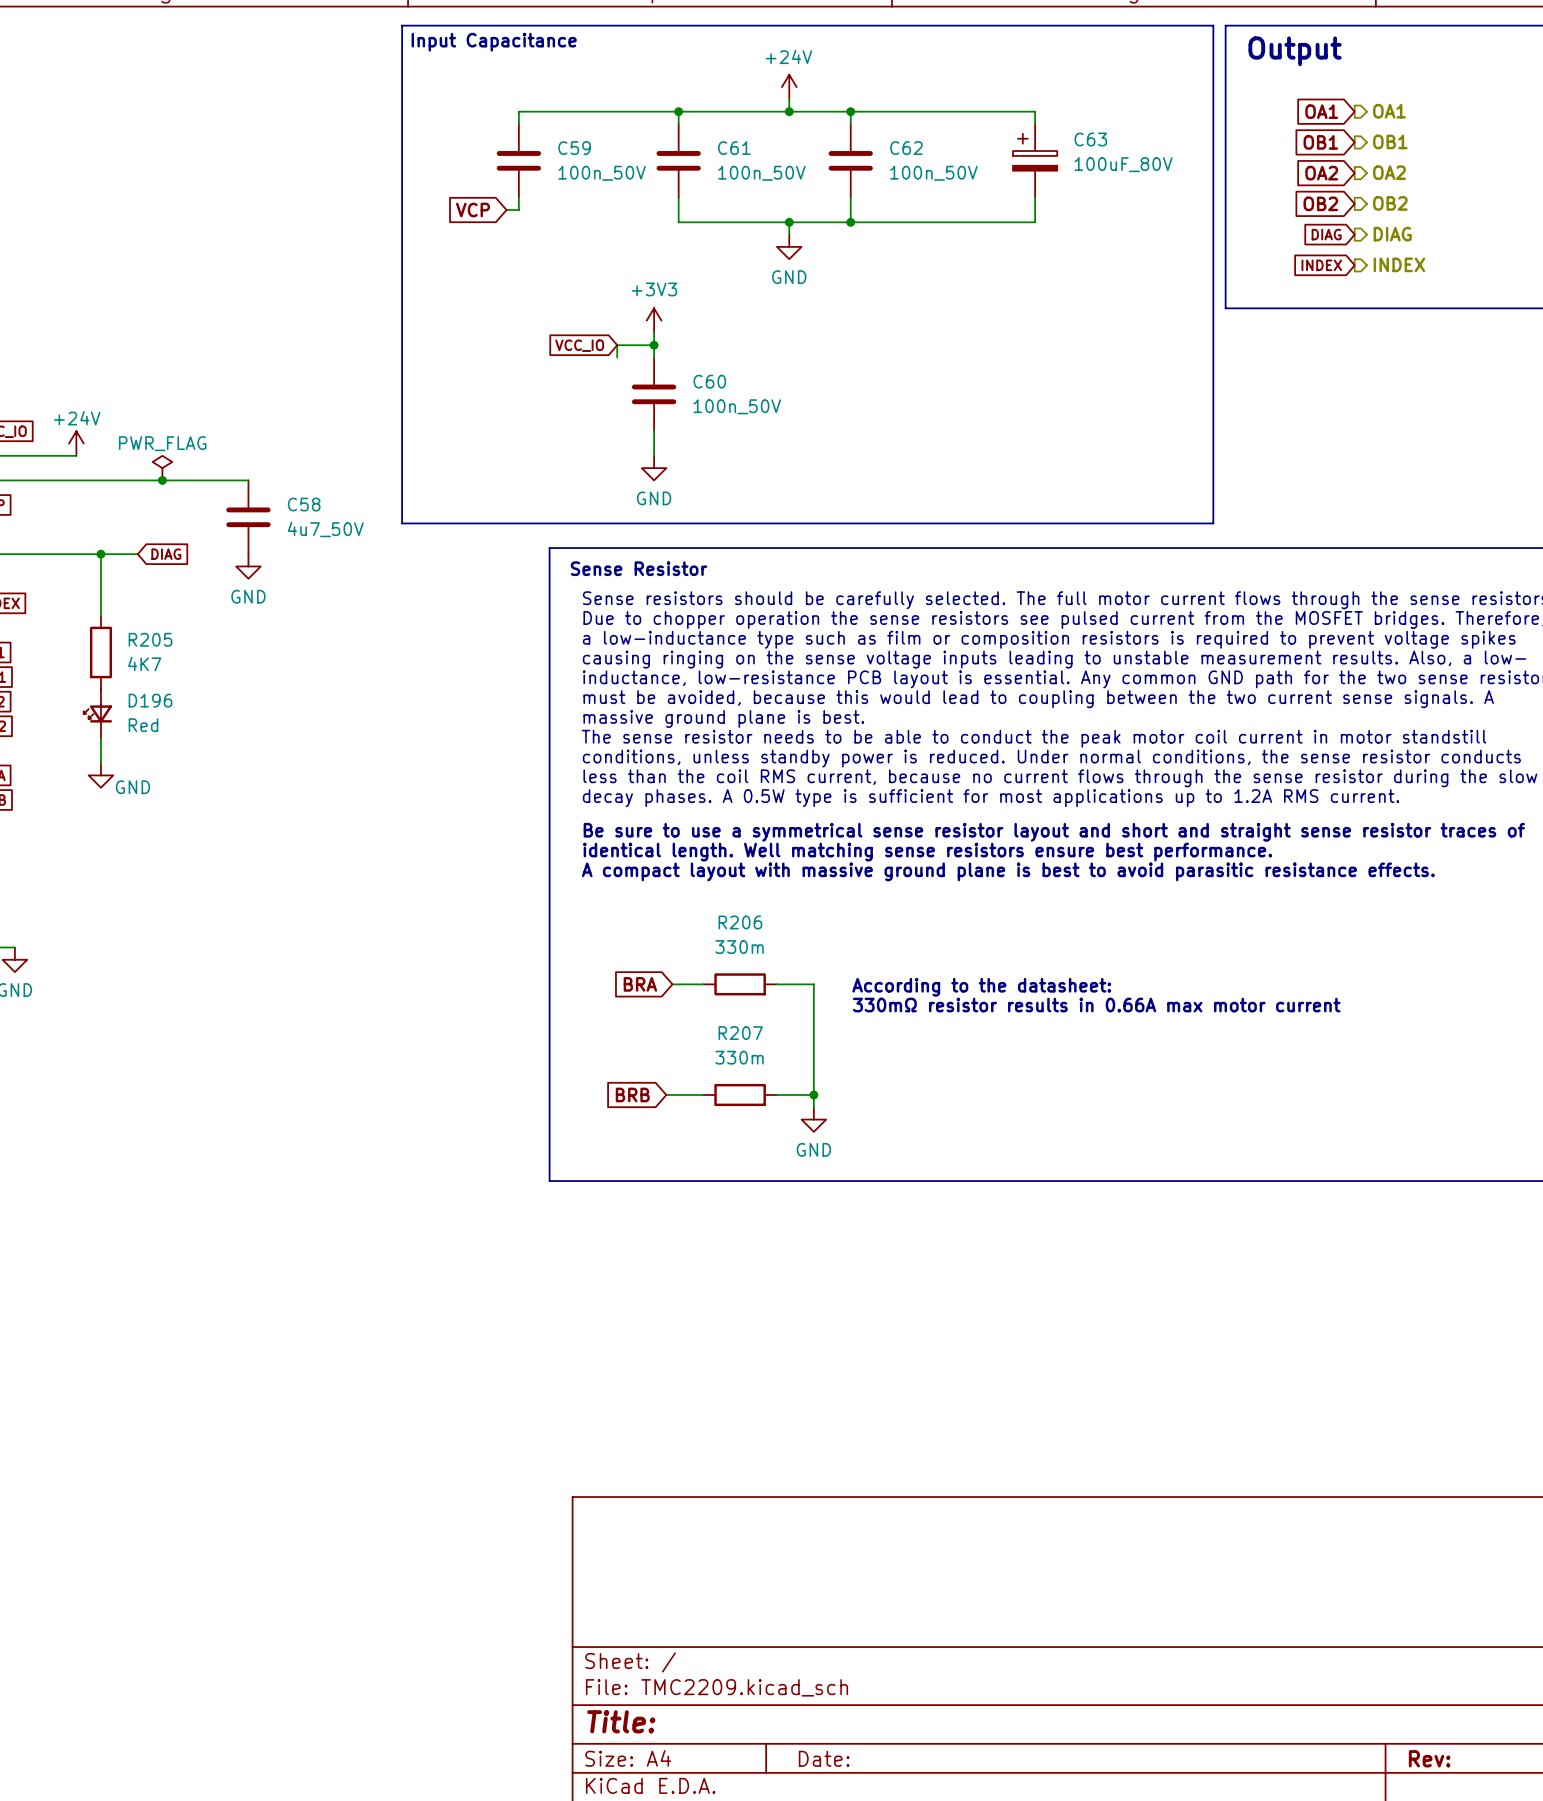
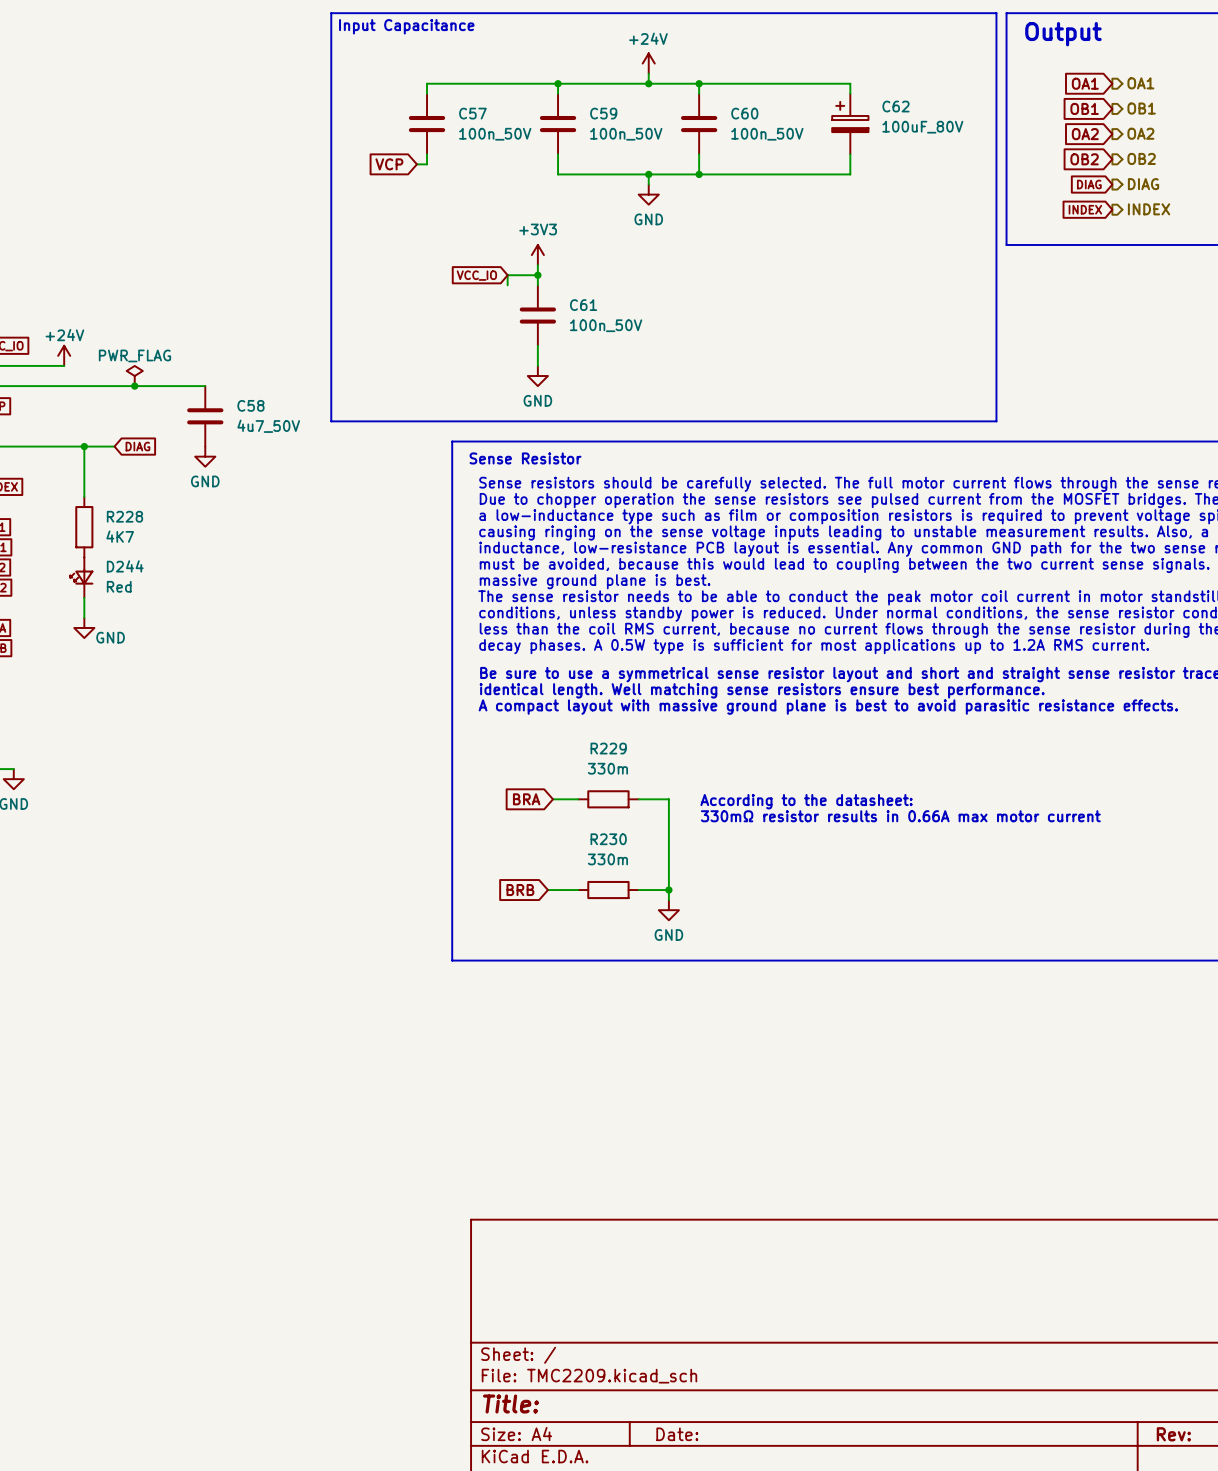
C63 name: C63 (1090, 139) -> C62 (895, 106)
C59 name: C59 (574, 148) -> C57 (472, 113)
C61 name: C61 (734, 148) -> C59 (603, 113)
C62 name: C62 (906, 148) -> C60 (744, 113)
C60 name: C60 (709, 381) -> C61 (583, 305)
R205 name: R205 (150, 639) -> R228 (124, 516)
D196 name: D196 (150, 700) -> D244 (125, 566)
R206 name: R206 (740, 922) -> R229 (608, 748)
R207 name: R207 (740, 1033) -> R230 (608, 839)

